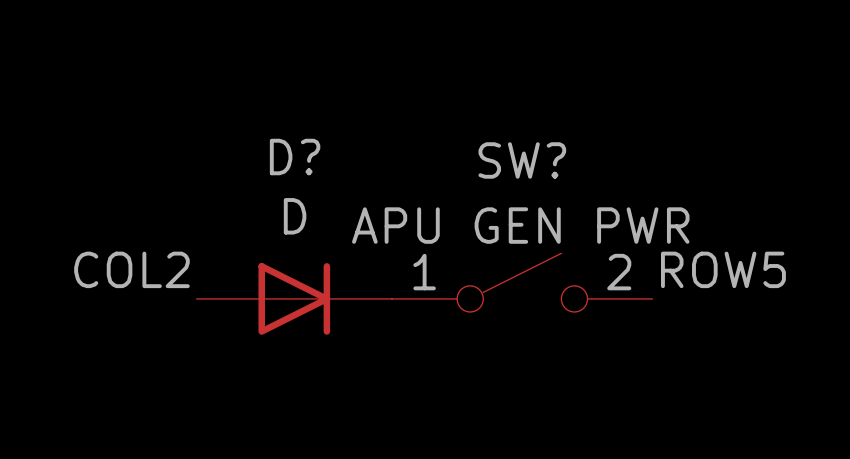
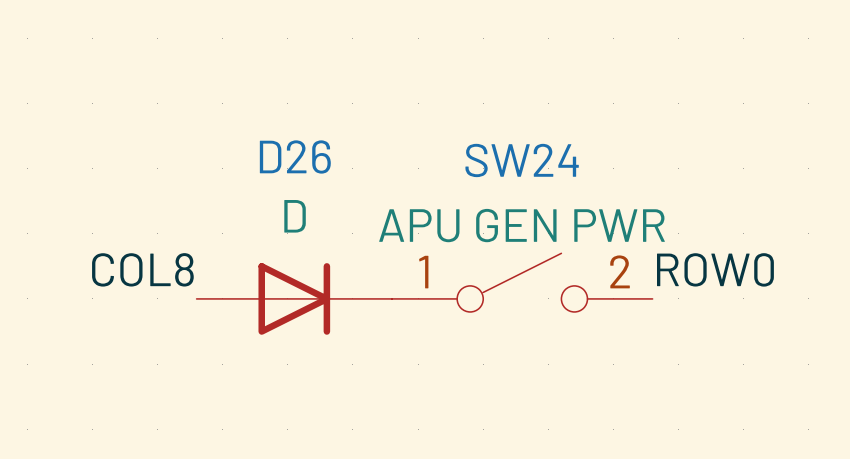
D? name: D? (295, 157) -> D26 (295, 156)
SW? name: SW? (522, 160) -> SW24 (522, 160)
label: COL2 (131, 269) -> COL8 (142, 269)
label: ROW5 (723, 269) -> ROW0 (715, 269)

